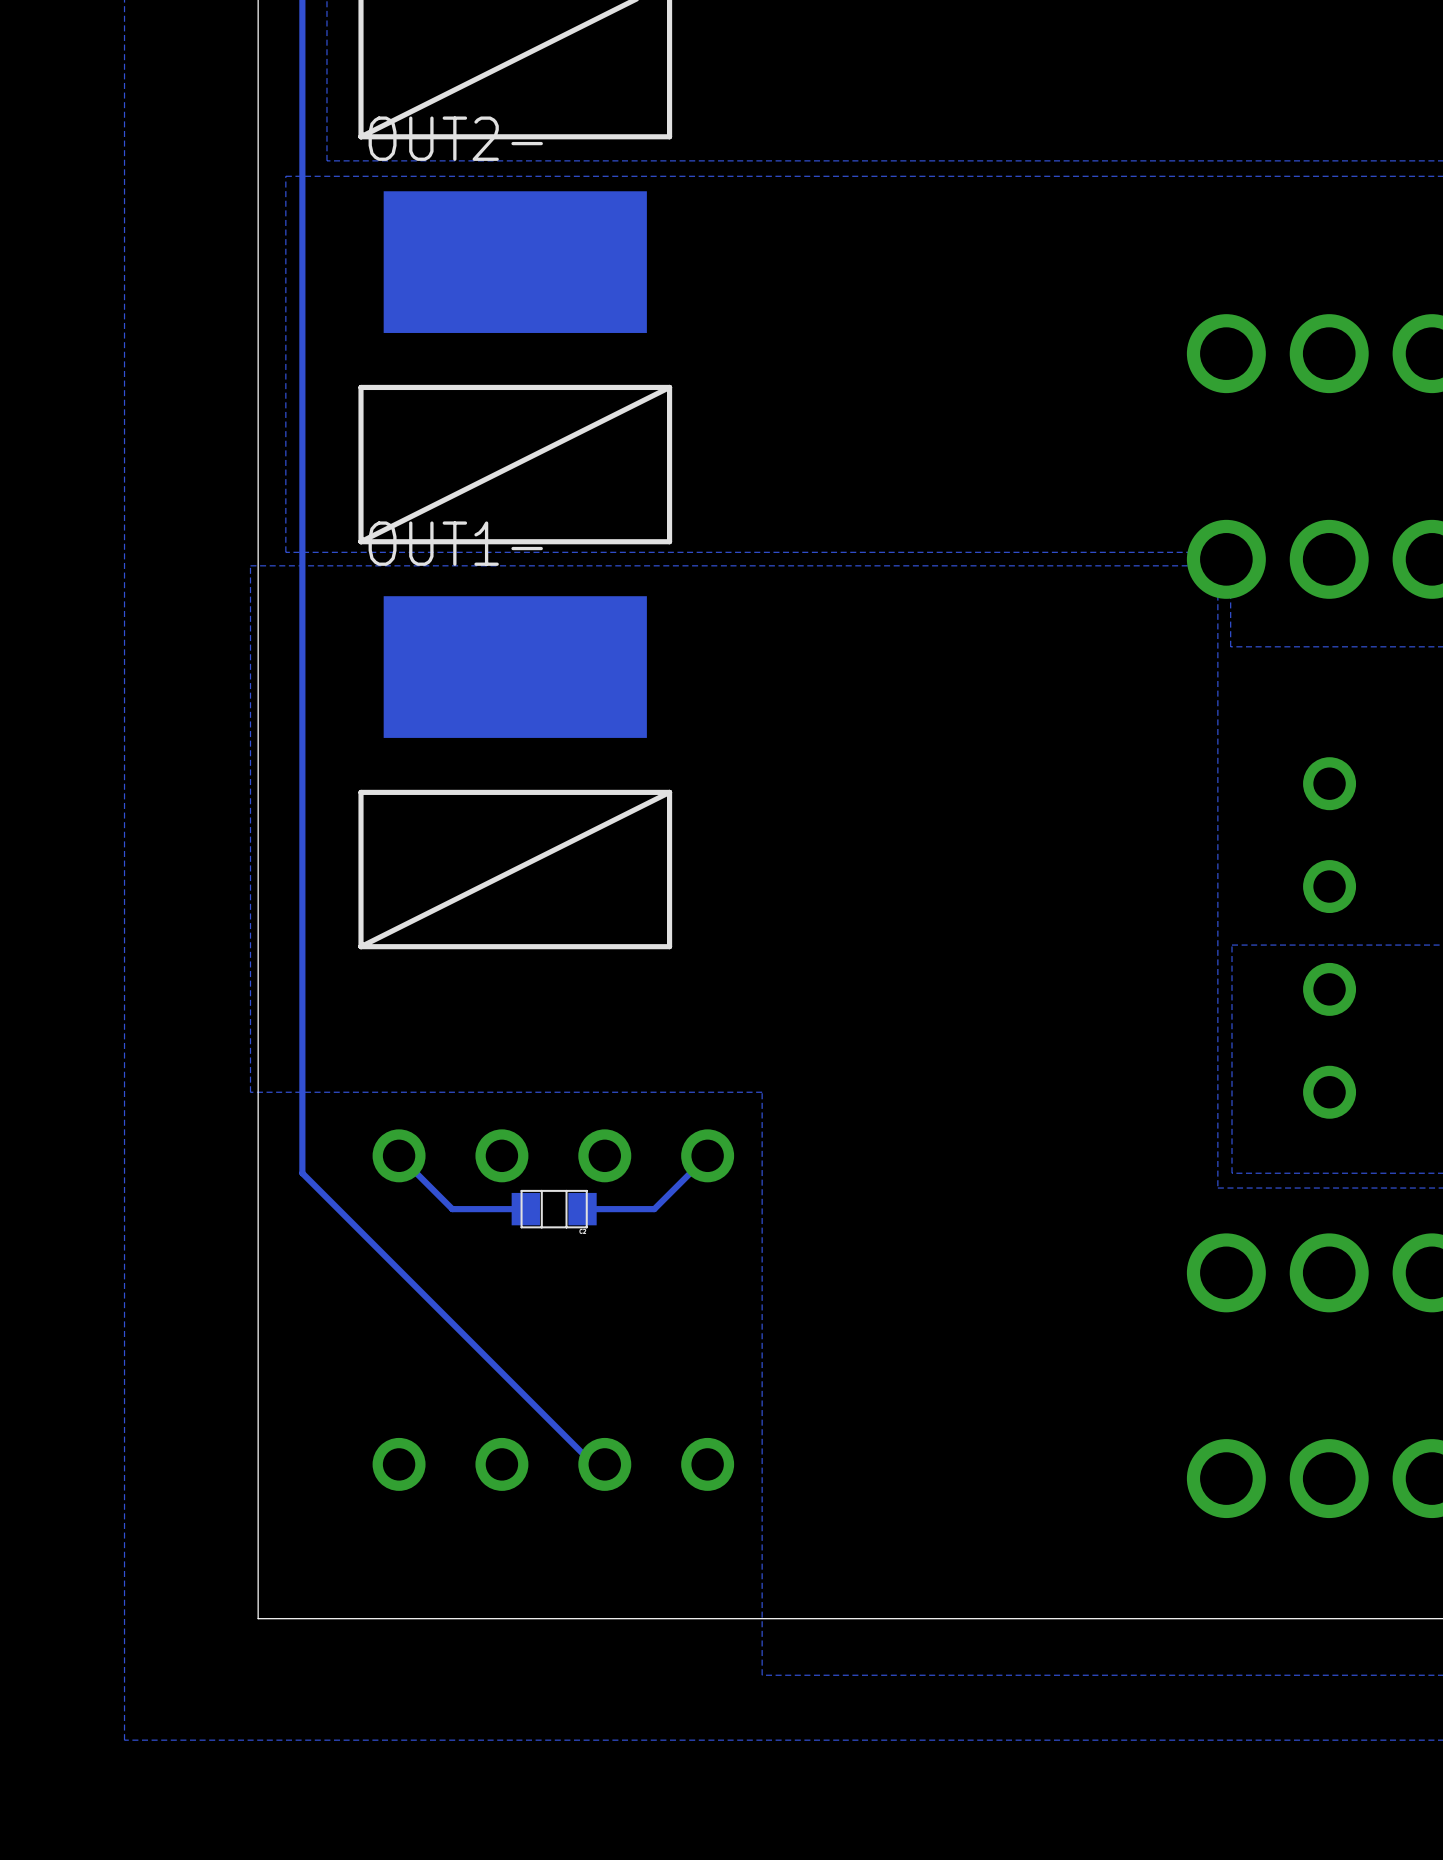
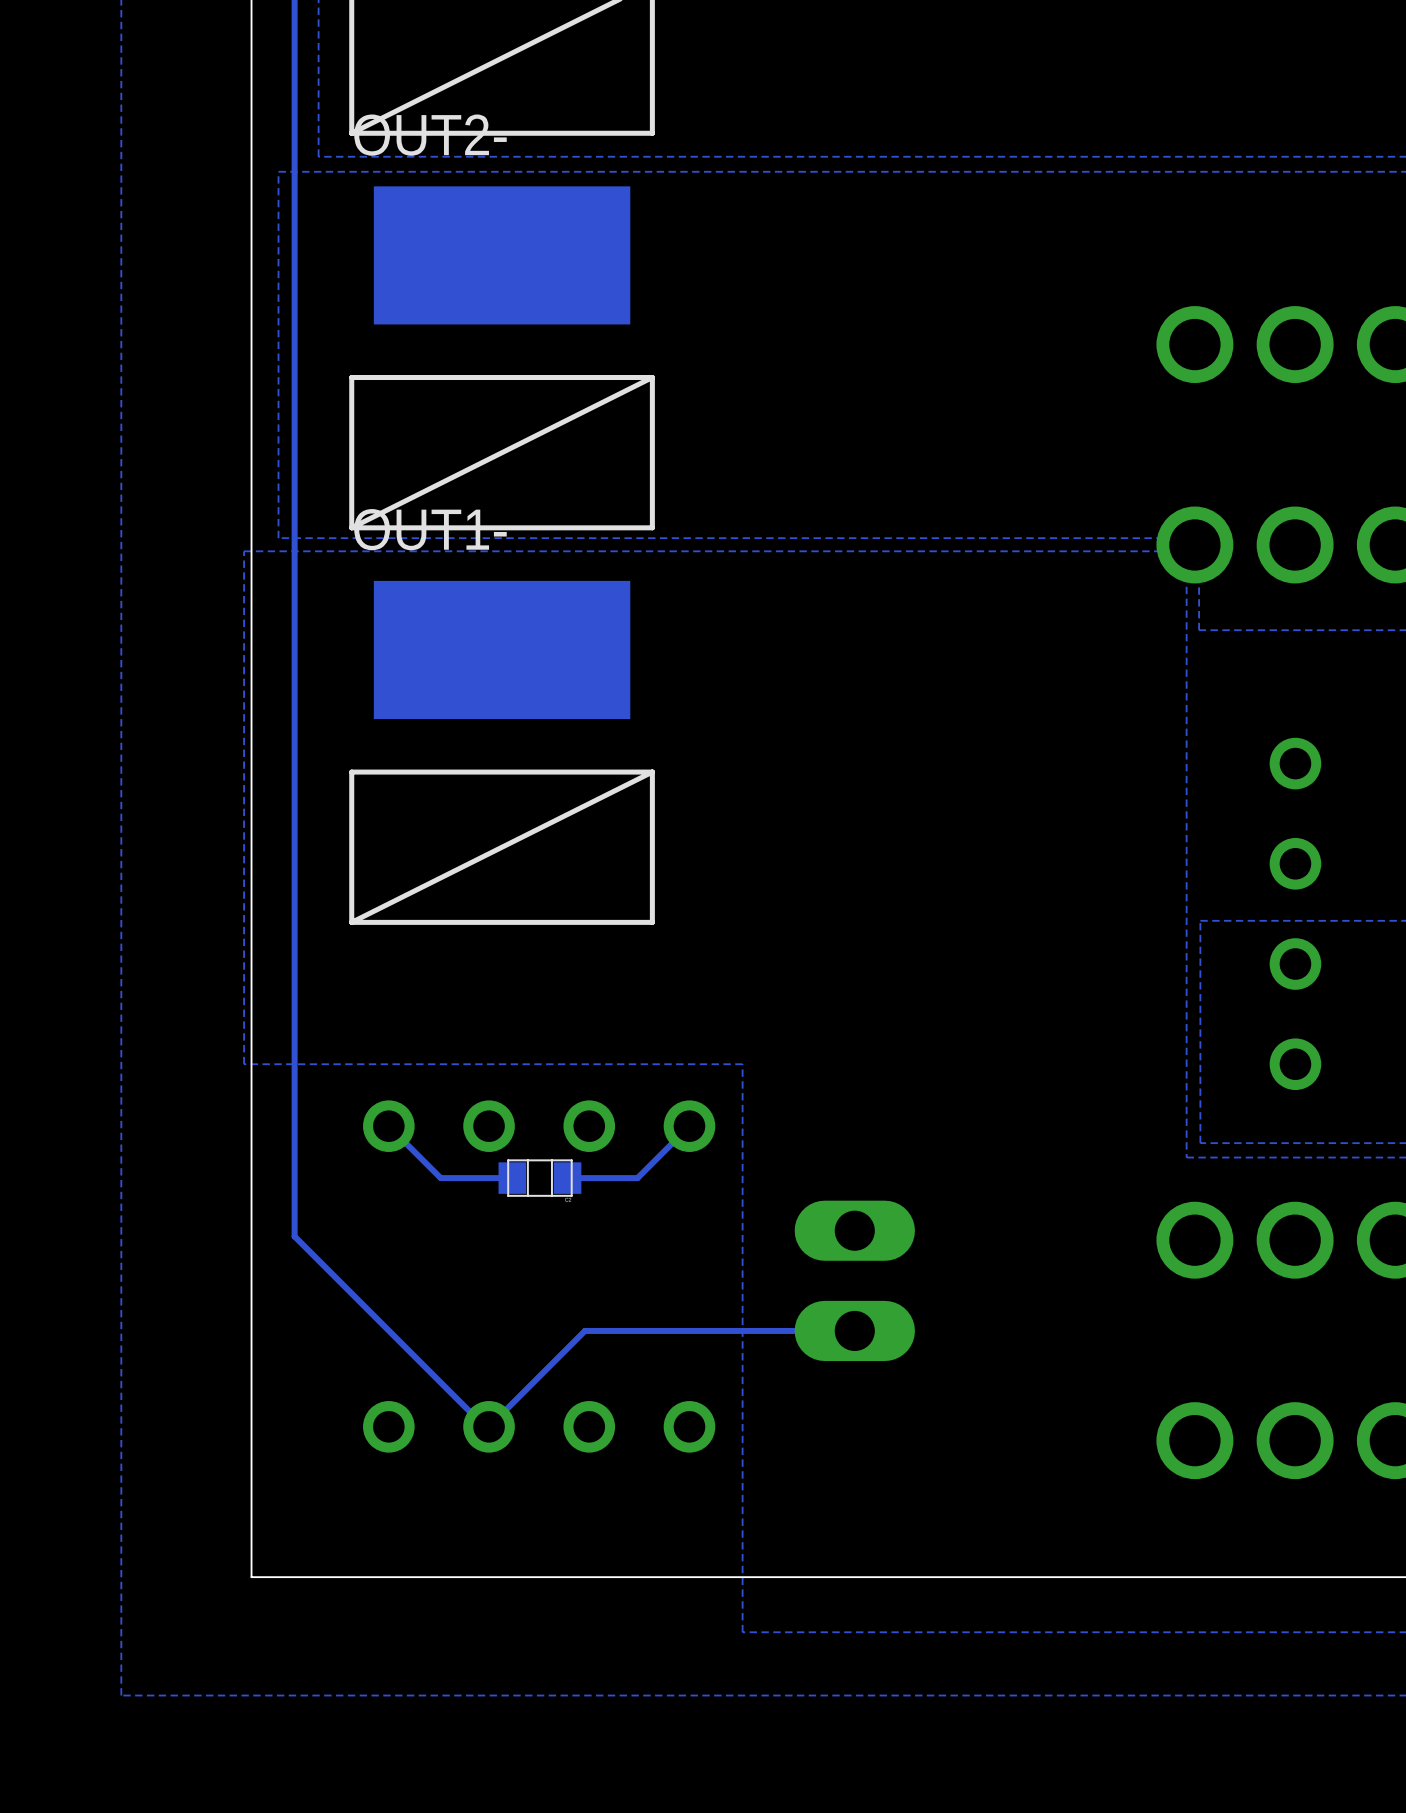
track: (302, 1173) (593, 1464) (604, 1464) -> (294, 1143) (294, 1236) (484, 1426) (489, 1426) (584, 1330) (854, 1330)
part: none -> (854, 1280)

